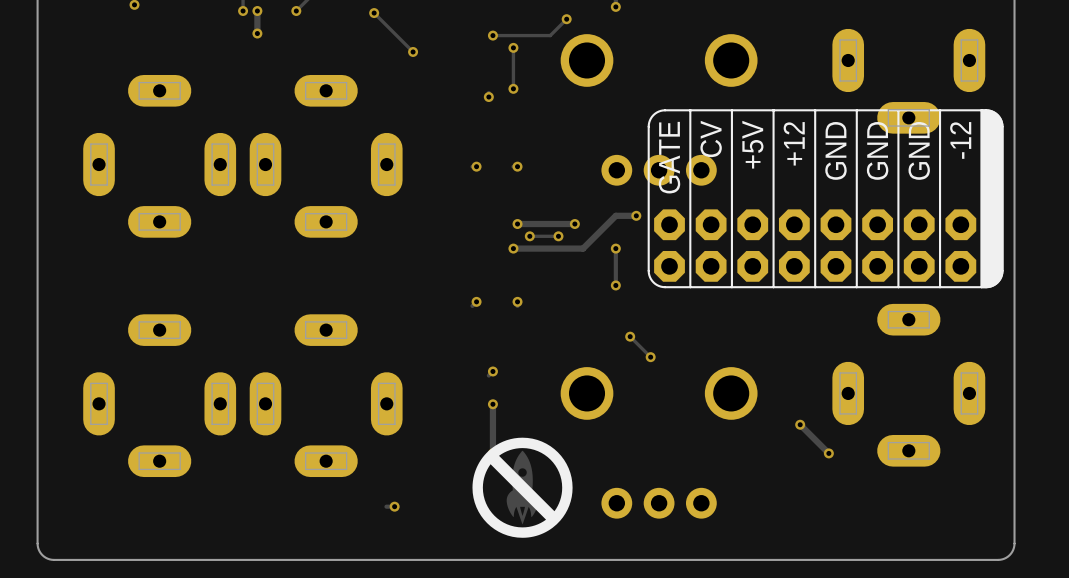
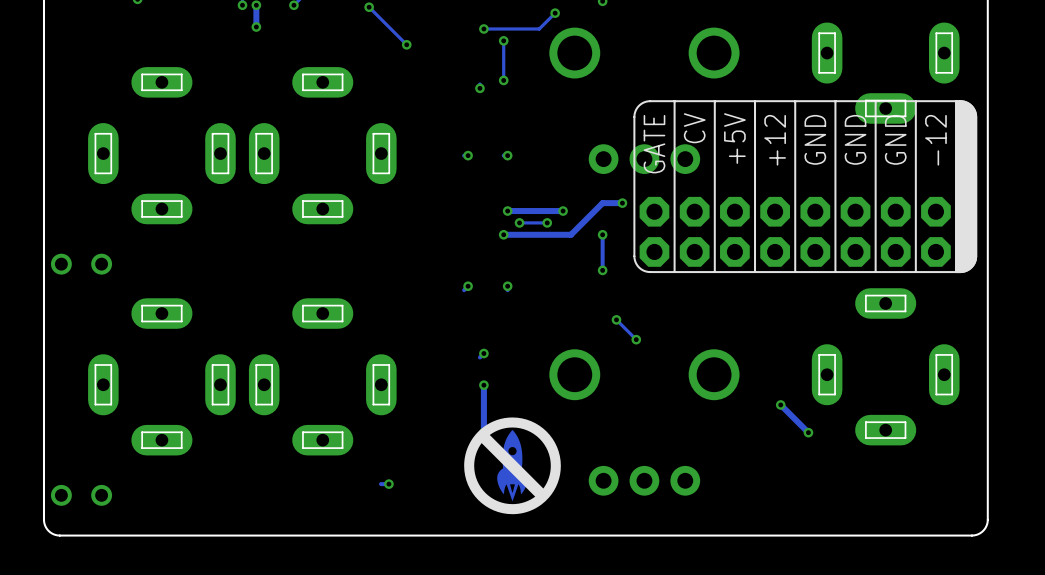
part: none -> (81, 264)
part: none -> (81, 495)

